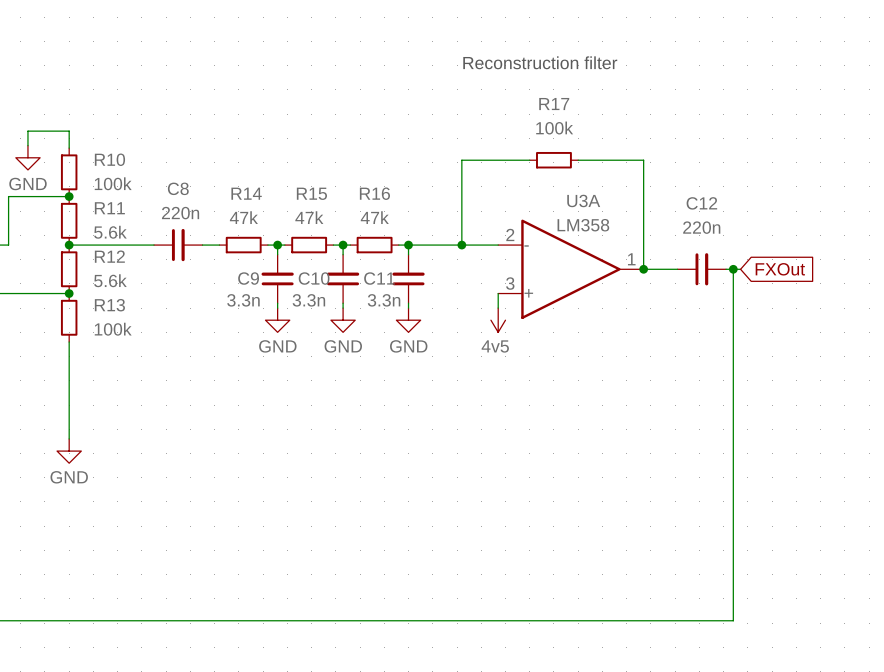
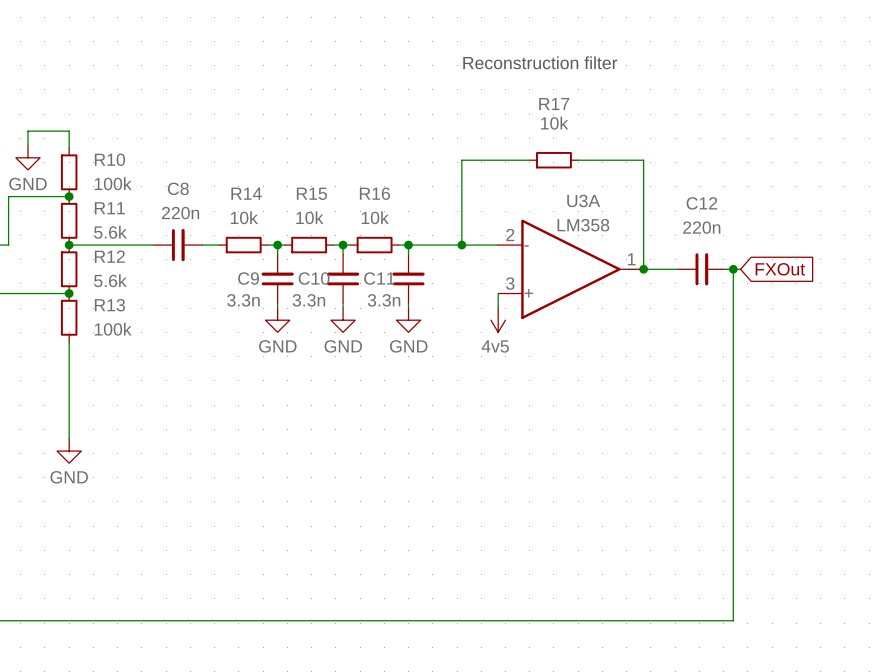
R17 value: 100k (554, 128) -> 10k (554, 123)
R14 value: 47k (243, 217) -> 10k (244, 217)
R15 value: 47k (309, 217) -> 10k (309, 217)
R16 value: 47k (374, 217) -> 10k (375, 217)

